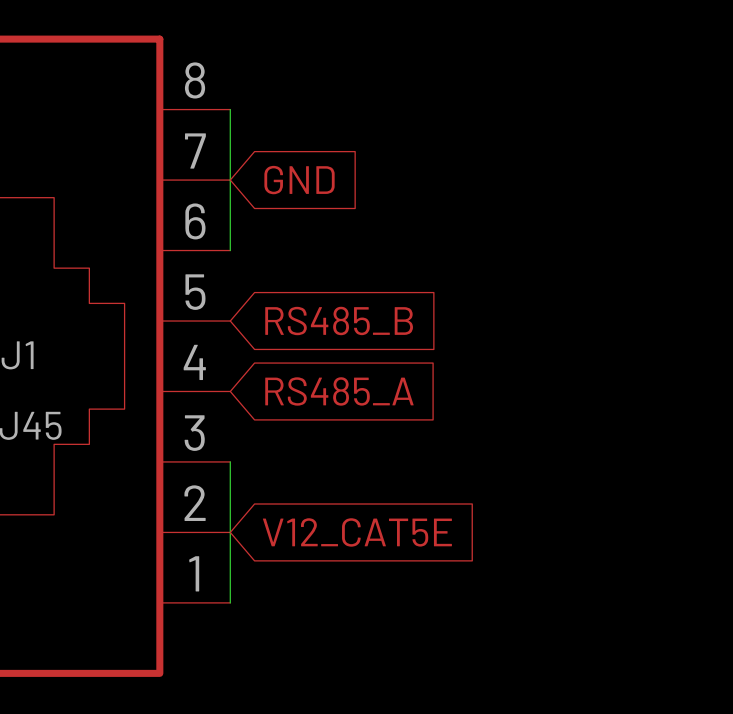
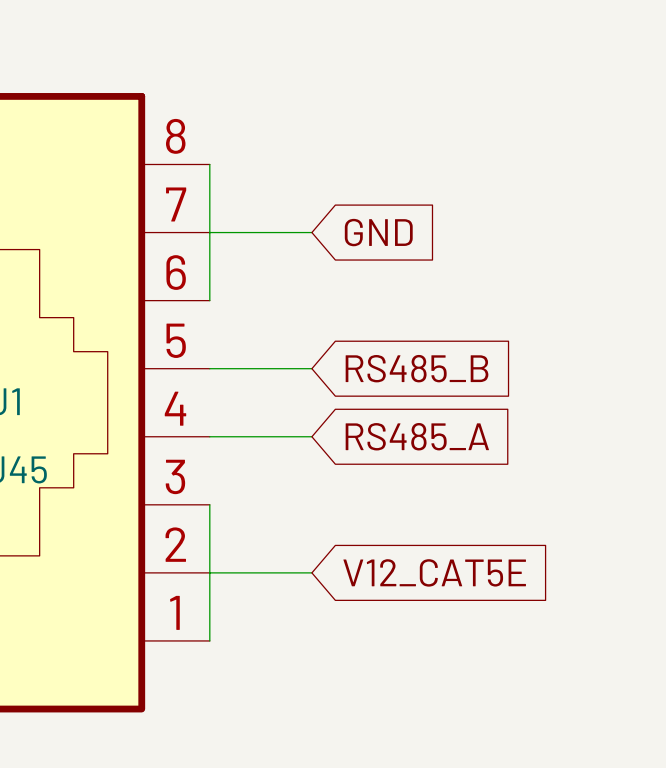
wire: none -> (209, 232) (311, 232)
global label position: GND (299, 180) -> GND (378, 232)
global label position: RS485_B (339, 320) -> RS485_B (417, 368)
wire: none -> (209, 368) (311, 368)
wire: none -> (209, 436) (311, 436)
global label position: RS485_A (339, 391) -> RS485_A (417, 436)
wire: none -> (209, 572) (311, 572)
global label position: V12_CAT5E (357, 532) -> V12_CAT5E (434, 572)

